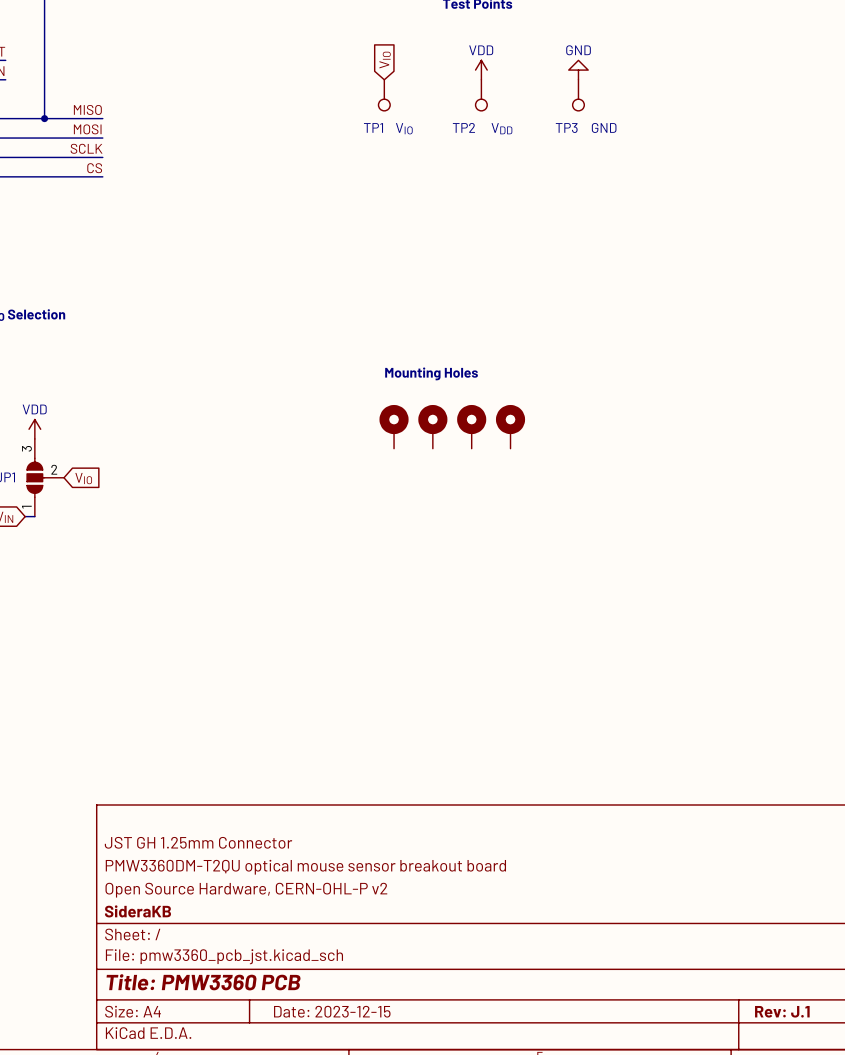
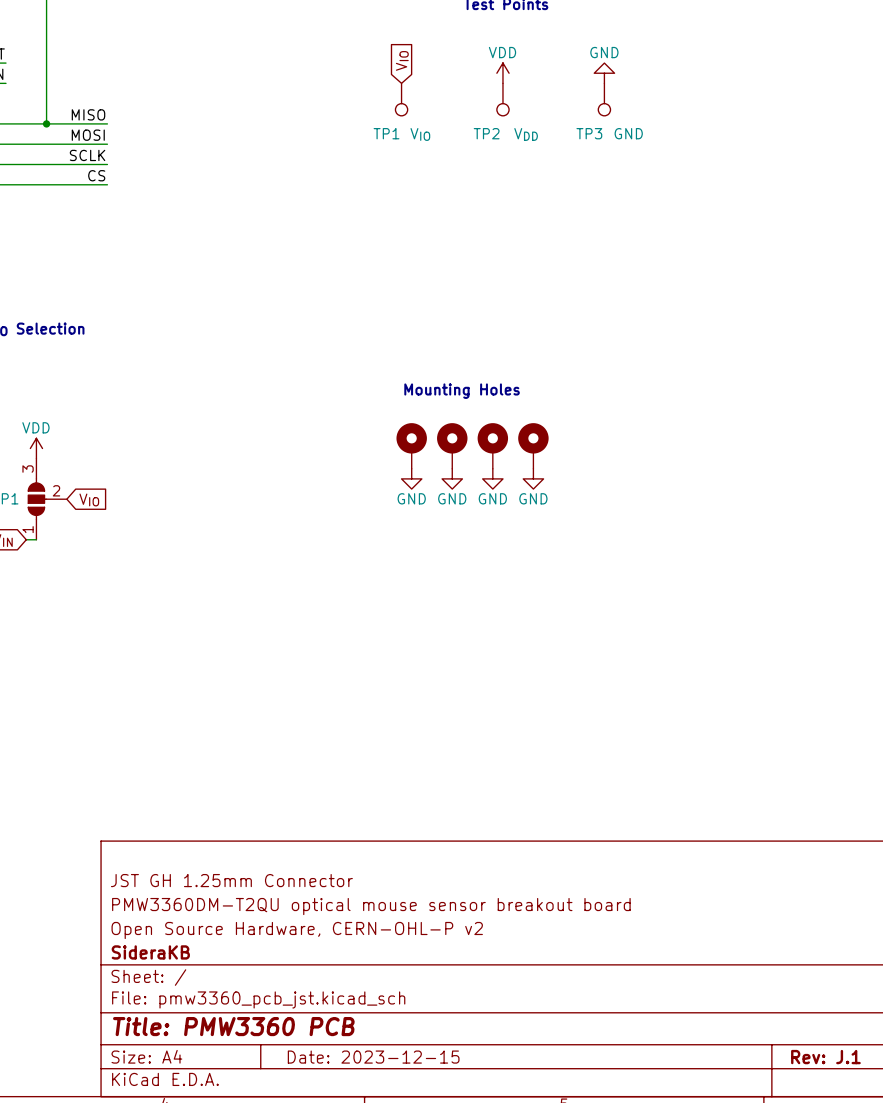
power symbol: none -> GND (411, 478)
power symbol: none -> GND (452, 478)
power symbol: none -> GND (492, 478)
power symbol: none -> GND (533, 478)

